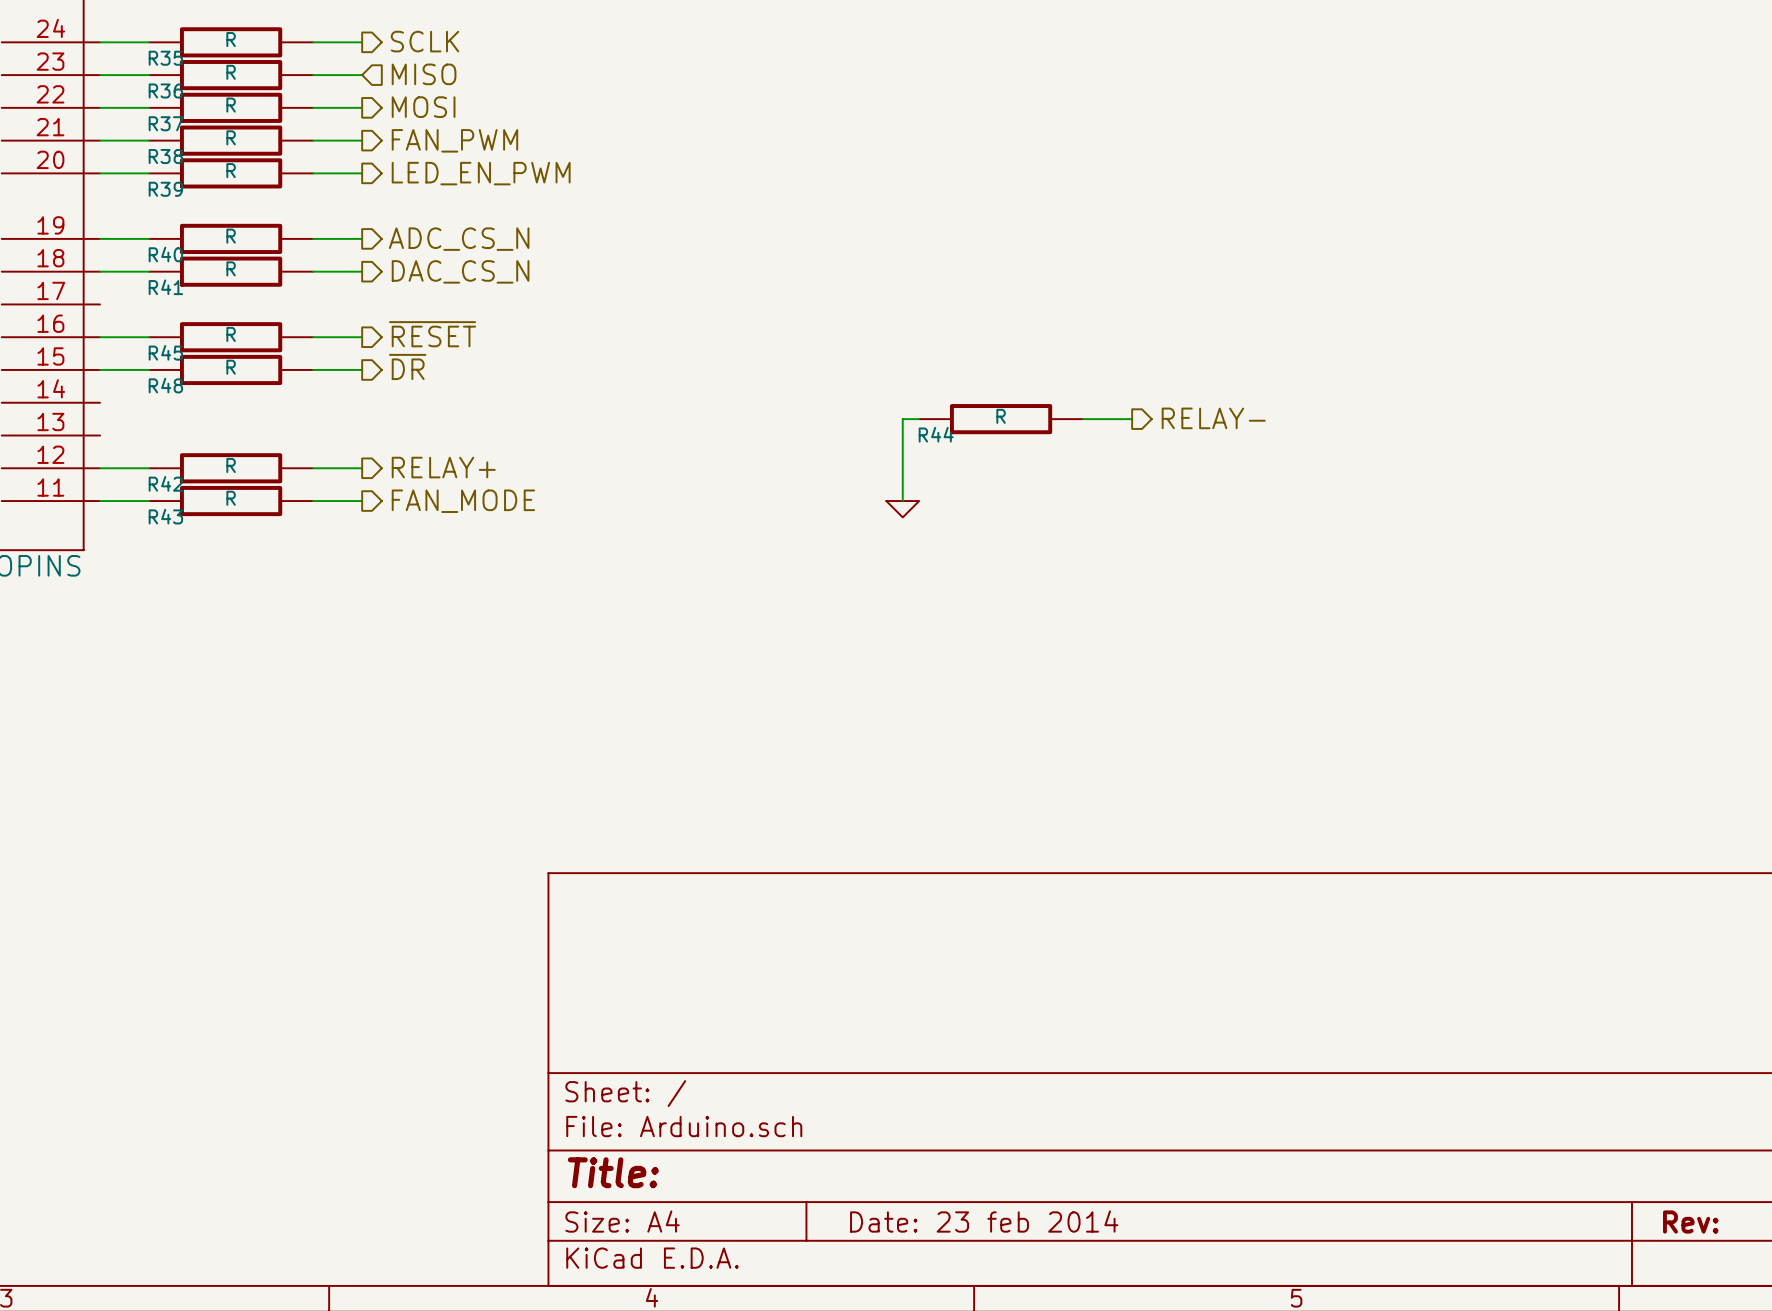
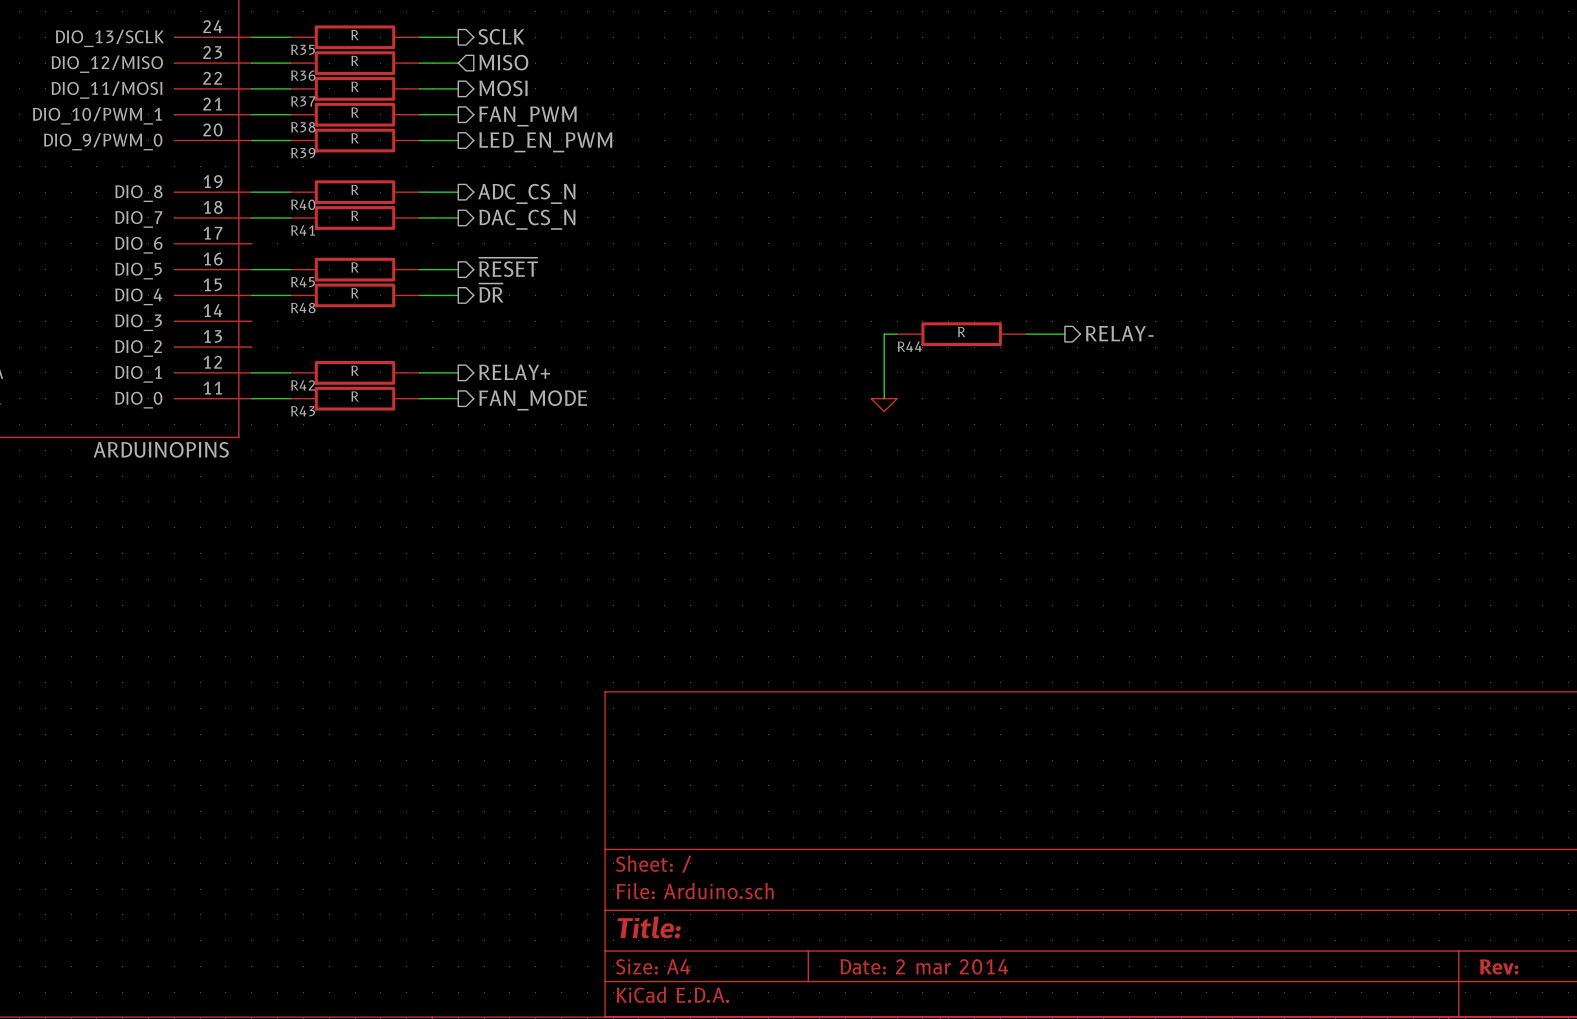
title block: Date: 23 feb 2014 (984, 1221) -> Date: 2 mar 2014 (924, 966)

